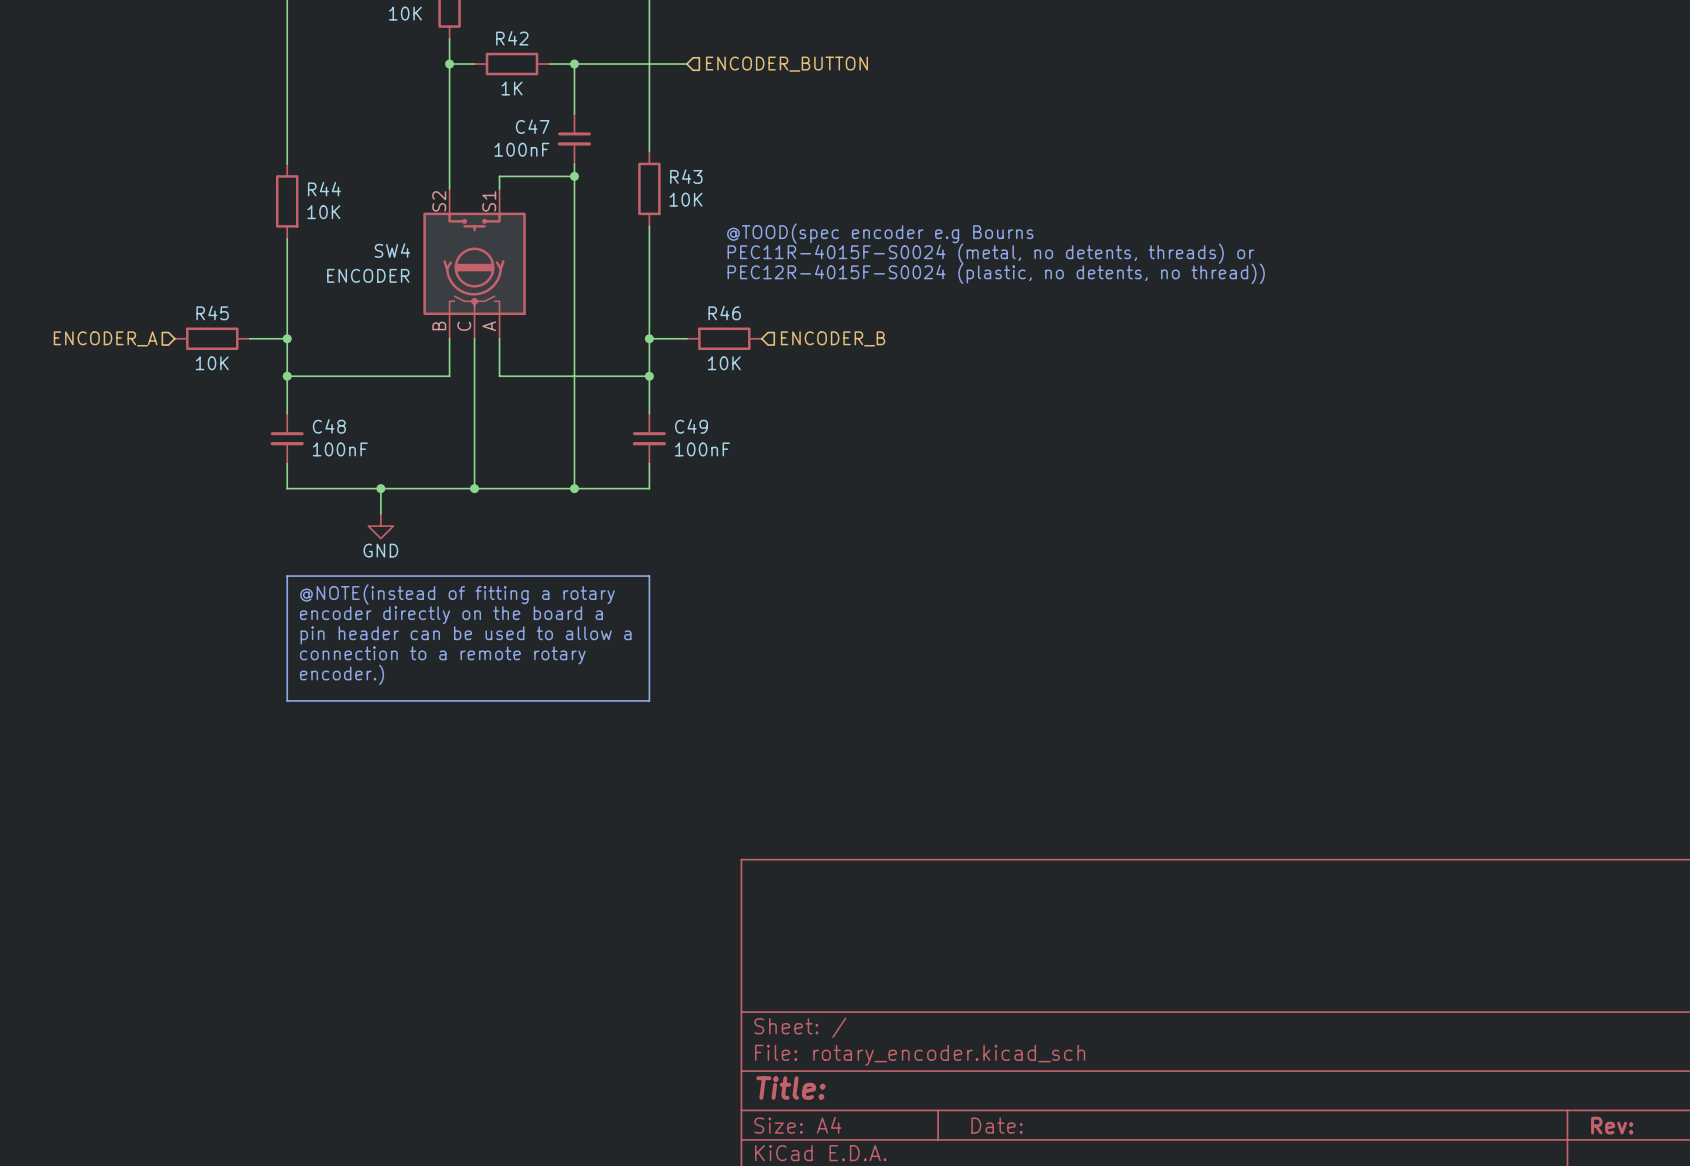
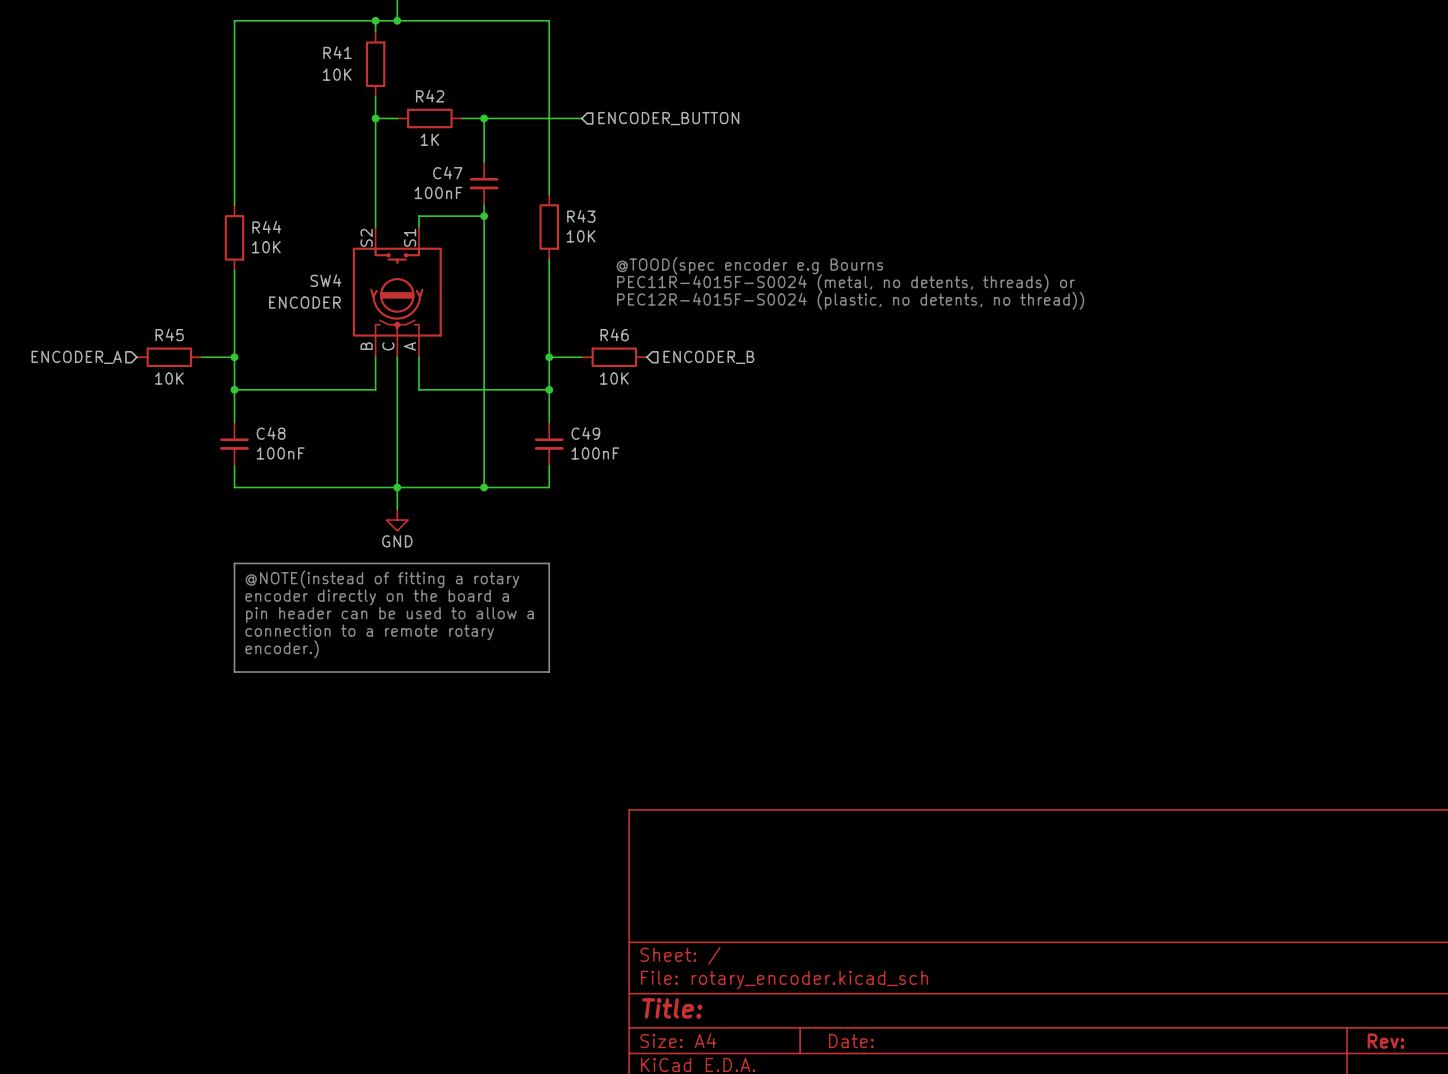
wire: (380, 488) (380, 513) -> (397, 487) (397, 509)
junction: (380, 488) -> none
power symbol position: GND (380, 526) -> GND (397, 520)

